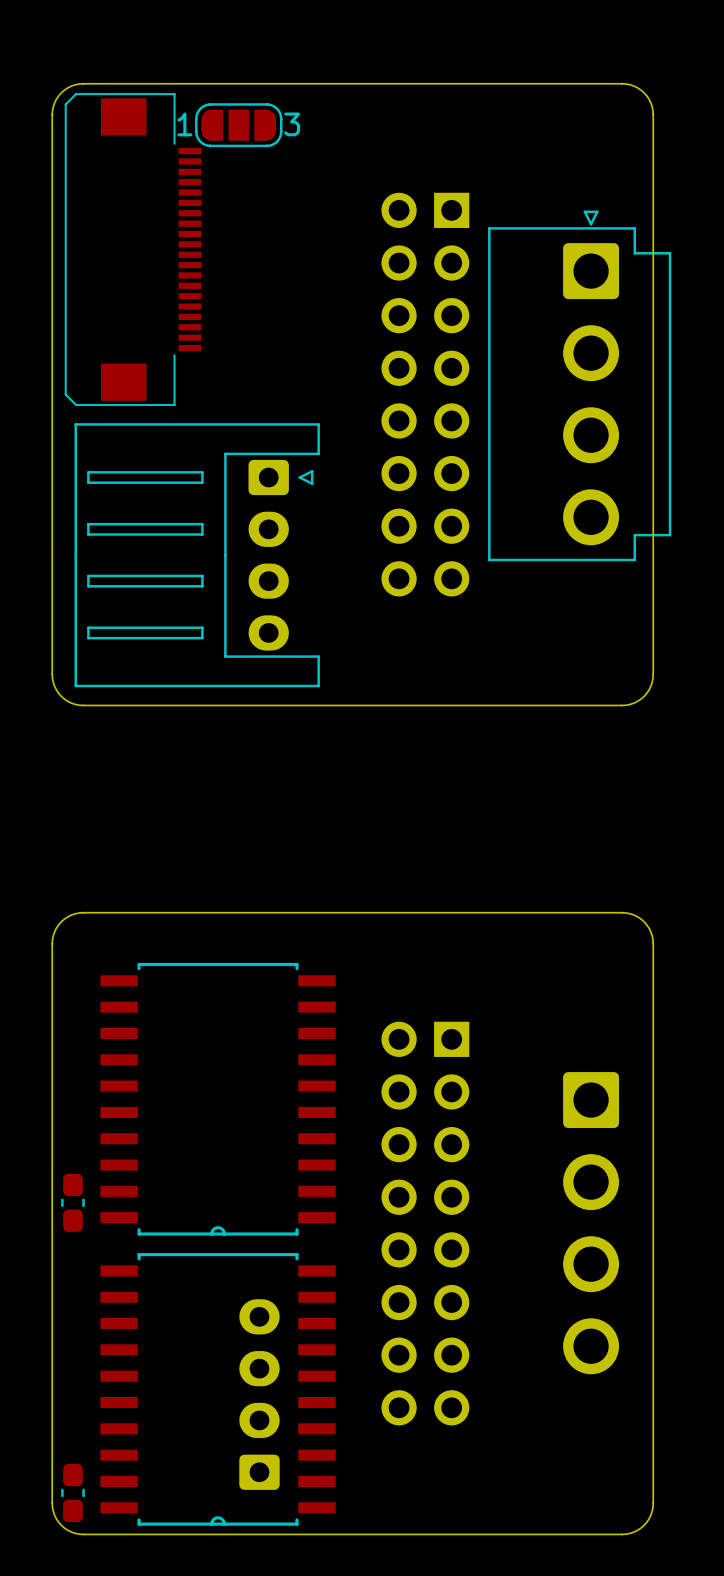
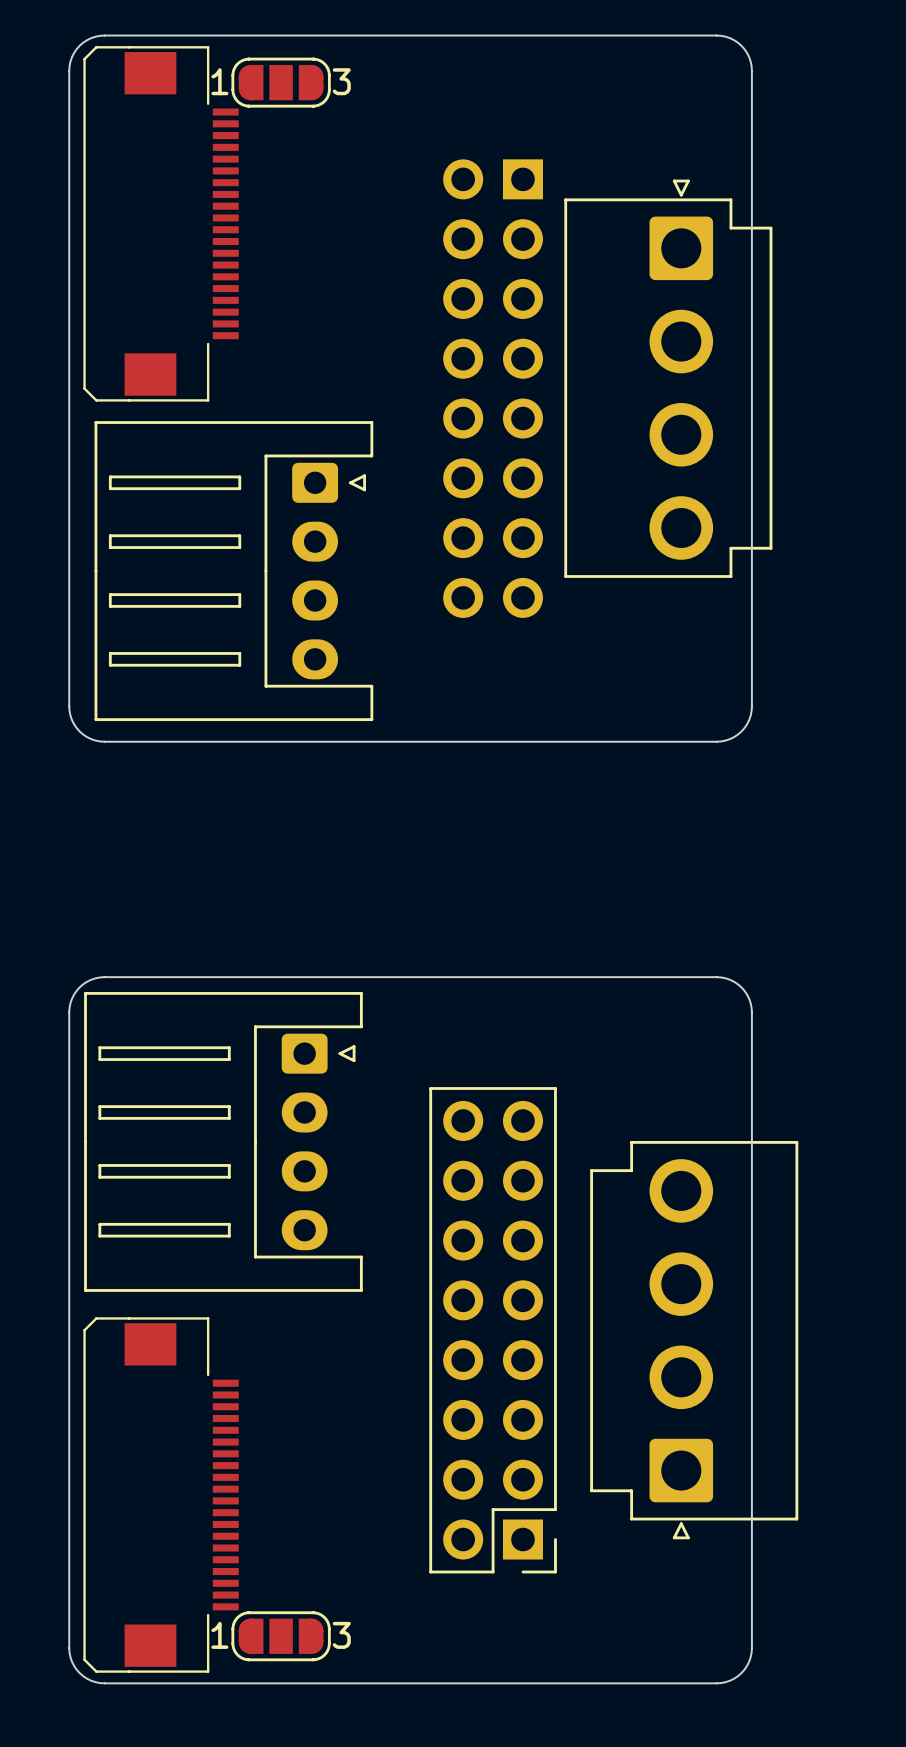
part: (218, 1099) -> none
part: (72, 1202) -> none
part side: bottom (425, 1223) -> top (493, 1330)
part side: bottom (591, 1223) -> top (694, 1340)
part: none -> (161, 1495)
part: (218, 1389) -> none
part side: bottom (259, 1394) -> top (223, 1141)
part: (72, 1492) -> none
part: none -> (281, 1636)

